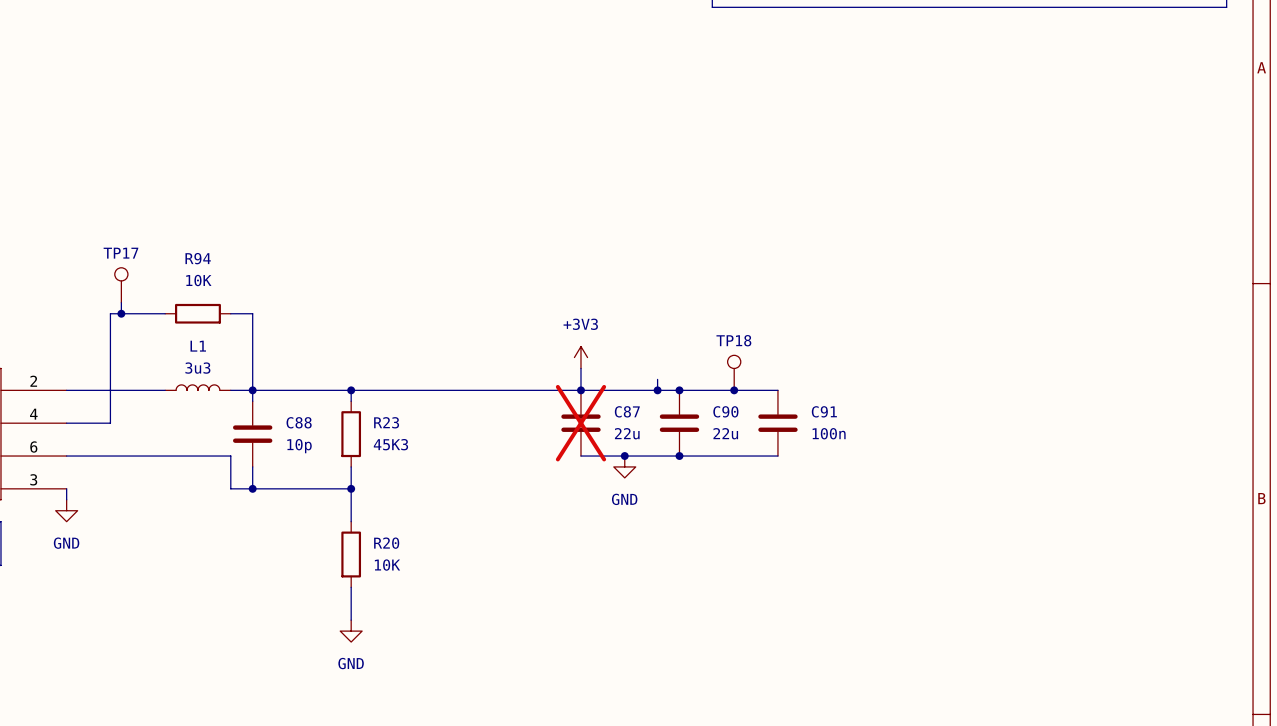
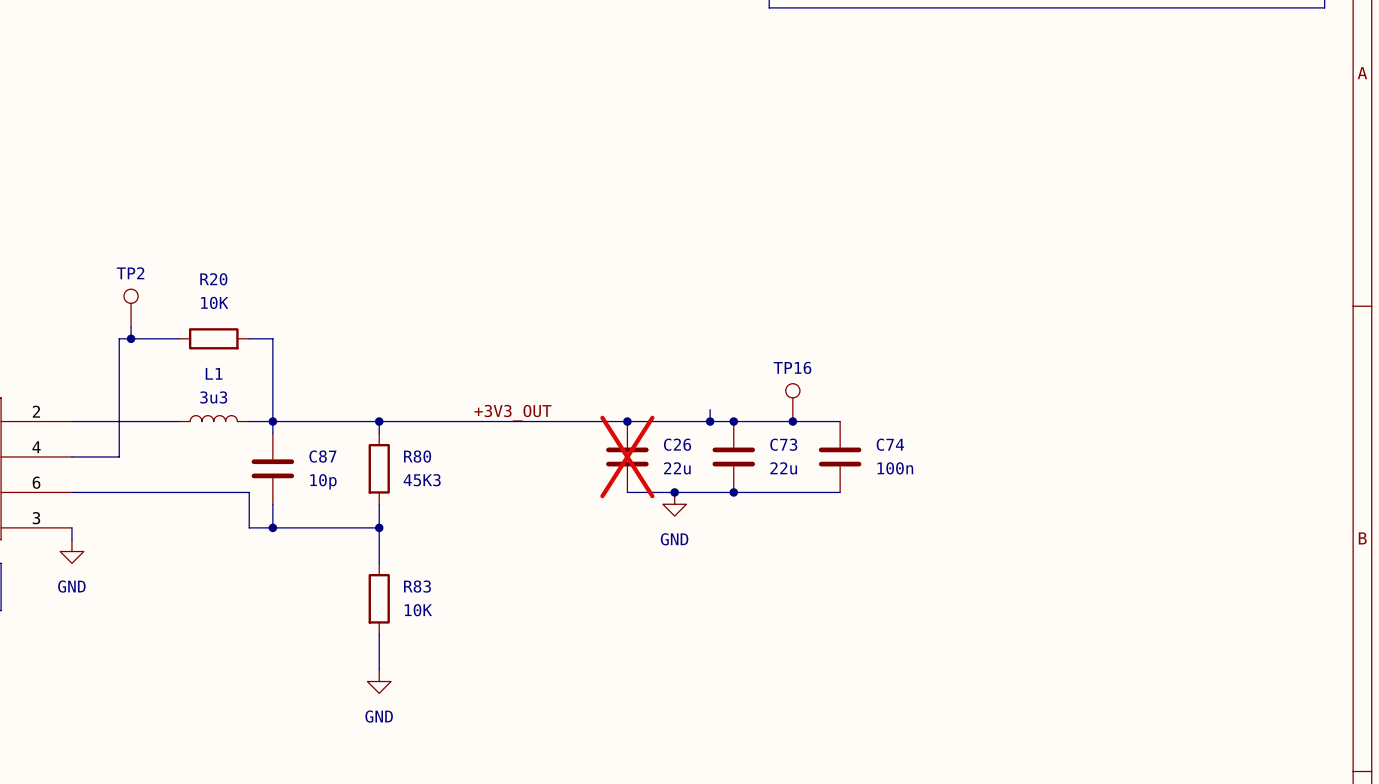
TP17 name: TP17 (120, 253) -> TP2 (130, 273)
R94 name: R94 (198, 258) -> R20 (213, 279)
TP18 name: TP18 (733, 340) -> TP16 (792, 367)
power symbol: +3V3 (580, 357) -> none
wire: (580, 368) (580, 390) -> none
label: none -> +3V3_OUT (512, 412)
C87 name: C87 (627, 411) -> C26 (677, 444)
C90 name: C90 (725, 411) -> C73 (783, 444)
C91 name: C91 (824, 411) -> C74 (890, 444)
C88 name: C88 (299, 422) -> C87 (322, 456)
R23 name: R23 (386, 422) -> R80 (417, 456)
R20 name: R20 (386, 543) -> R83 (417, 586)

